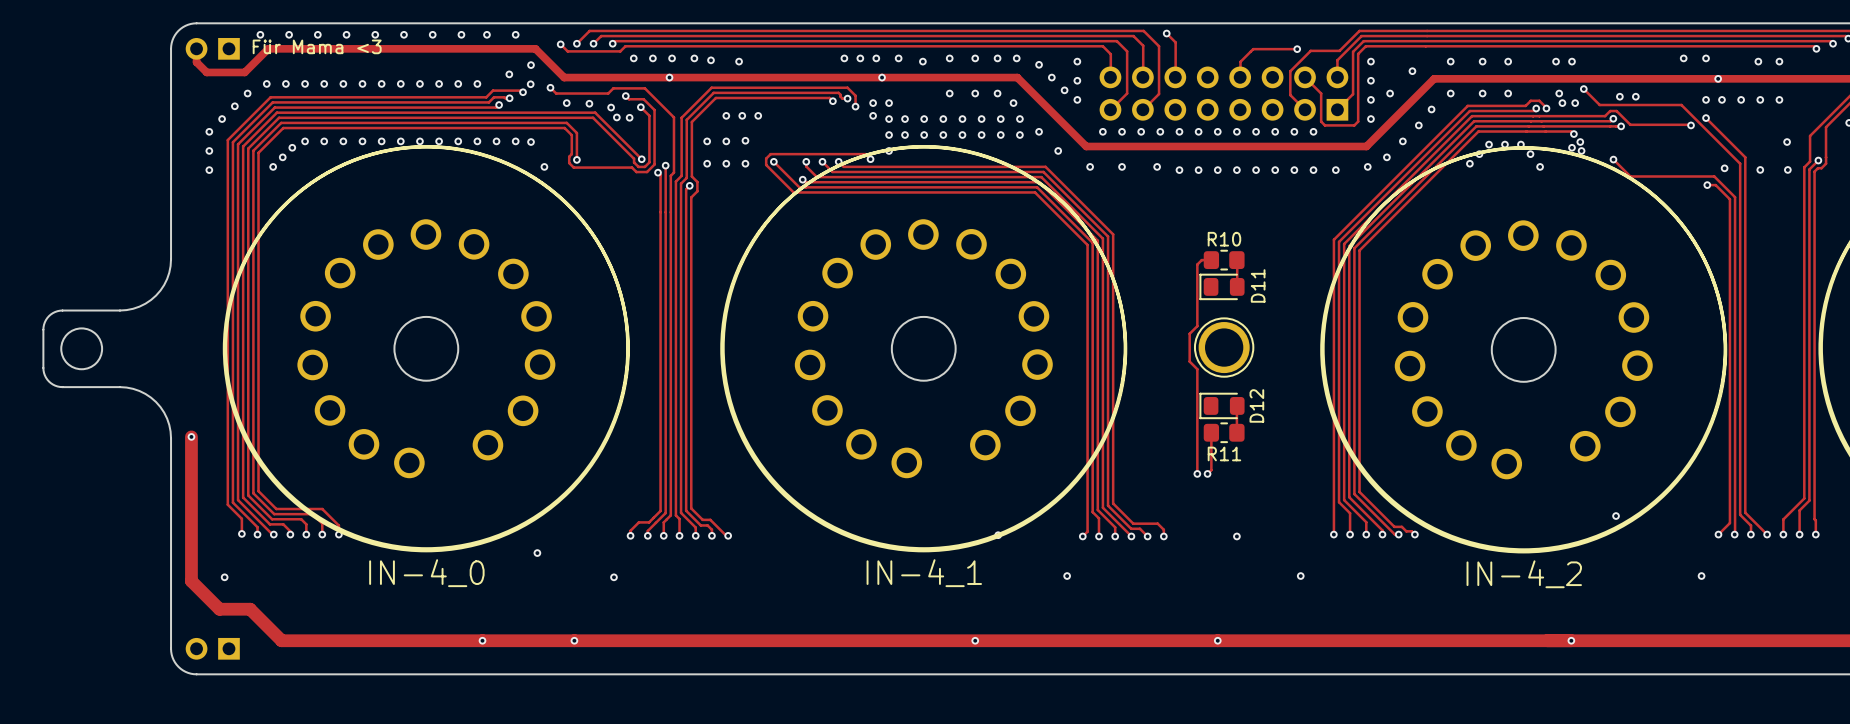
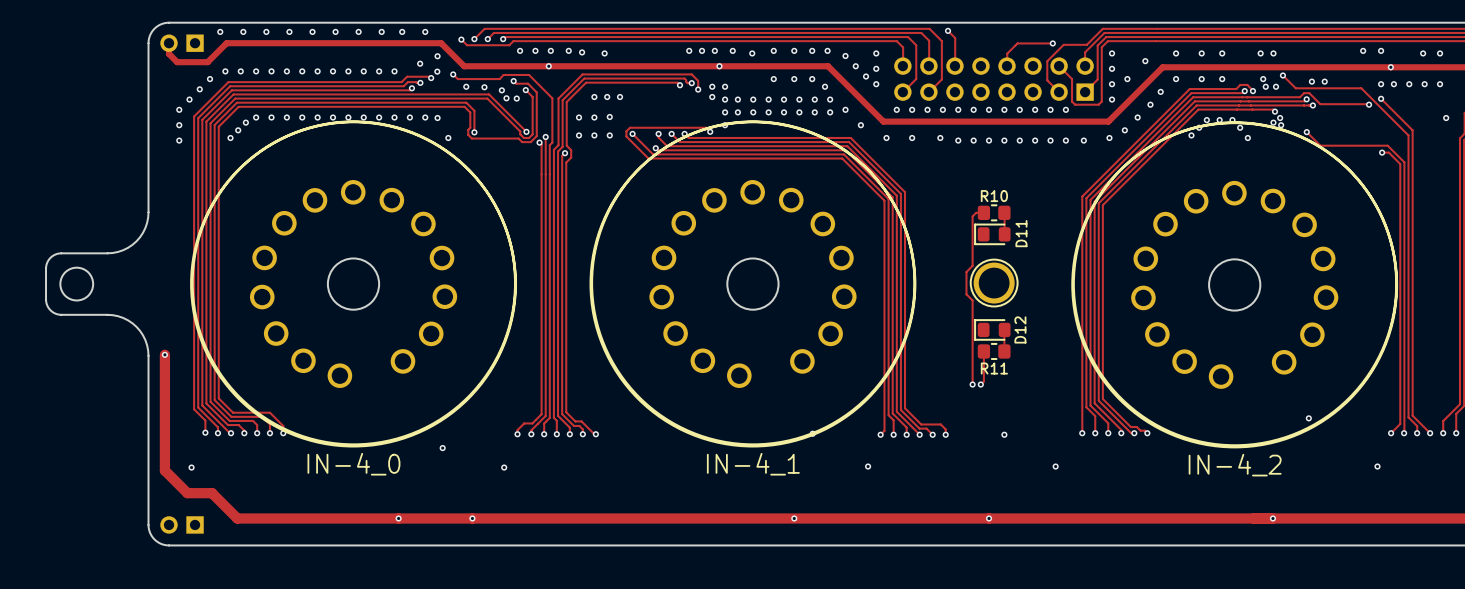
text: Für Mama <3 (317, 46) -> none
via: (1724, 168) -> none
via: (1760, 169) -> none
via: (1787, 169) -> none

